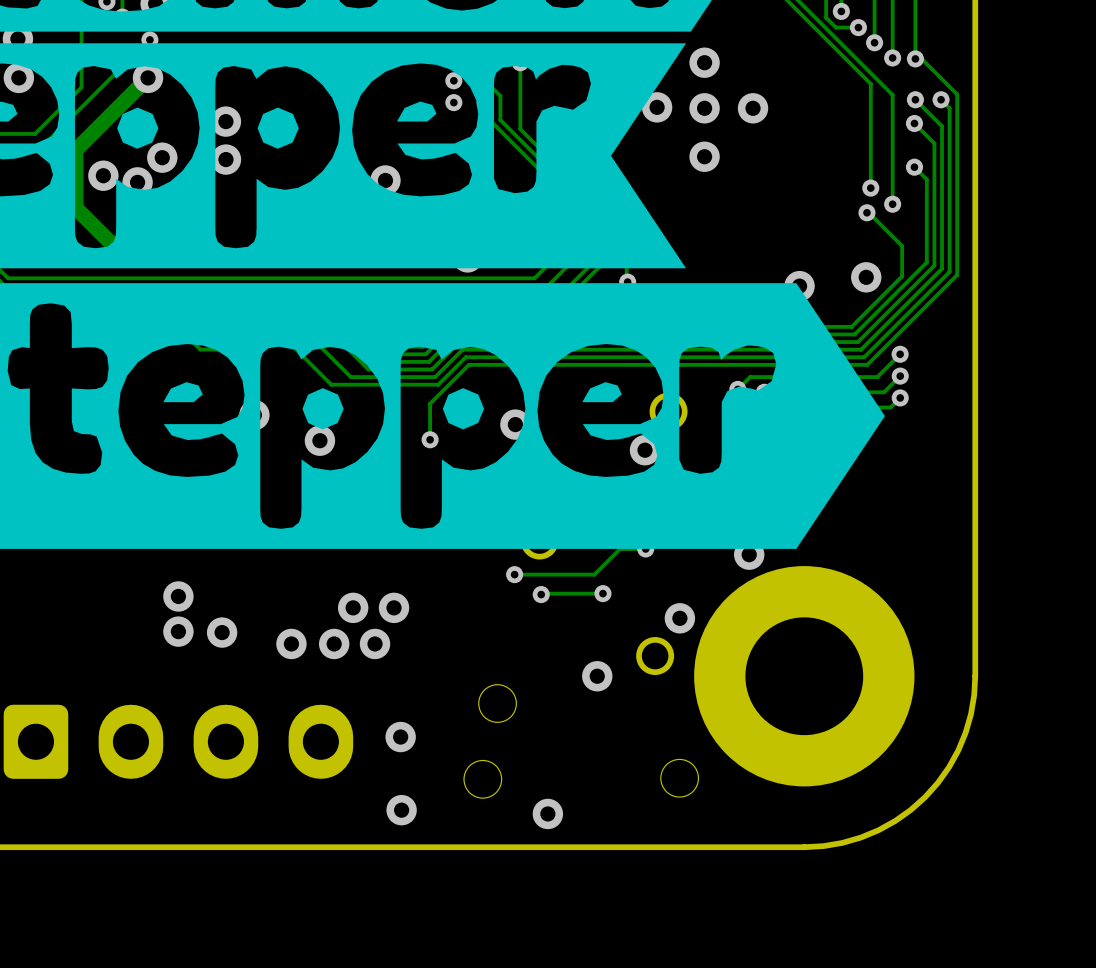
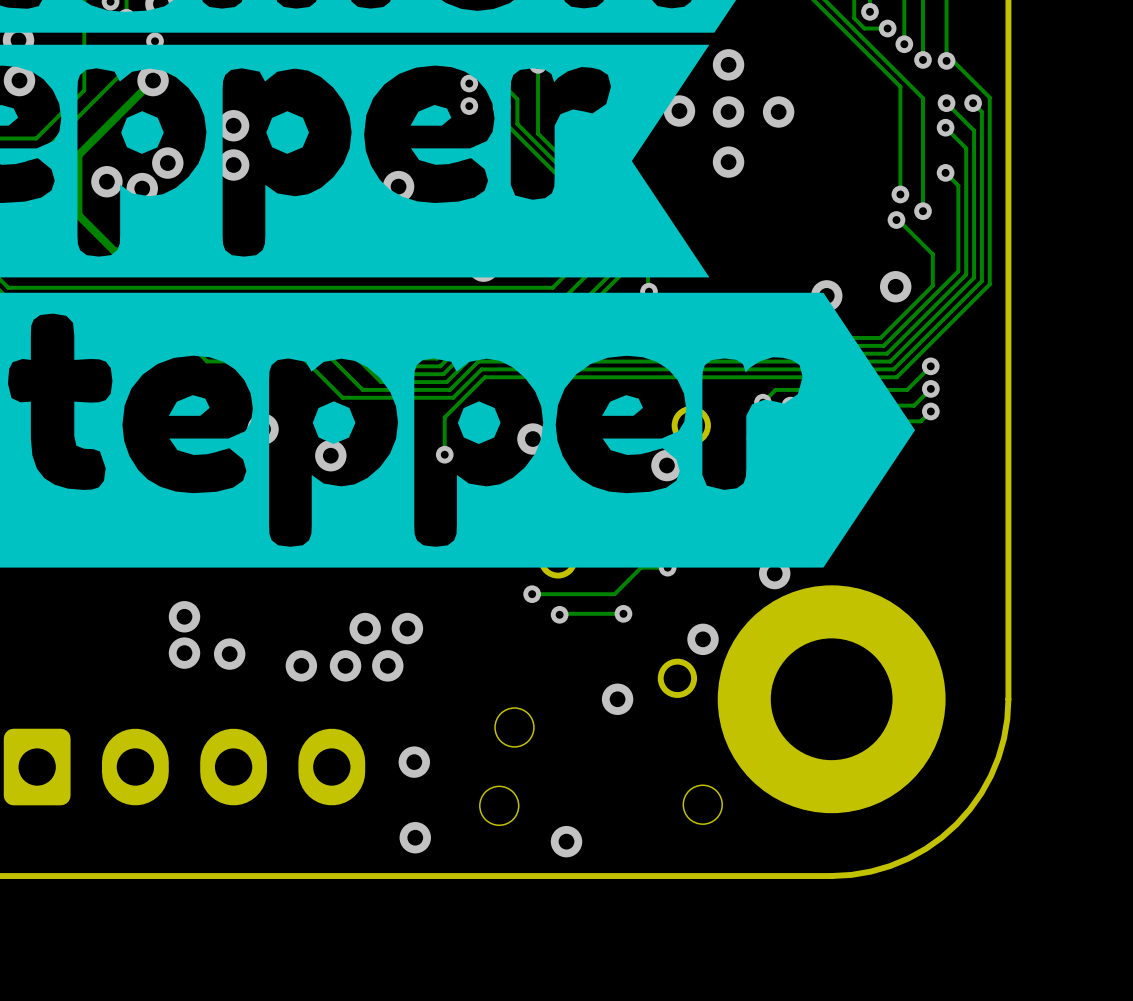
track width: thick (148, 77) (75, 150) (75, 208) (110, 243) (129, 243) -> thin (153, 80) (78, 155) (78, 215) (114, 251) (134, 251)

